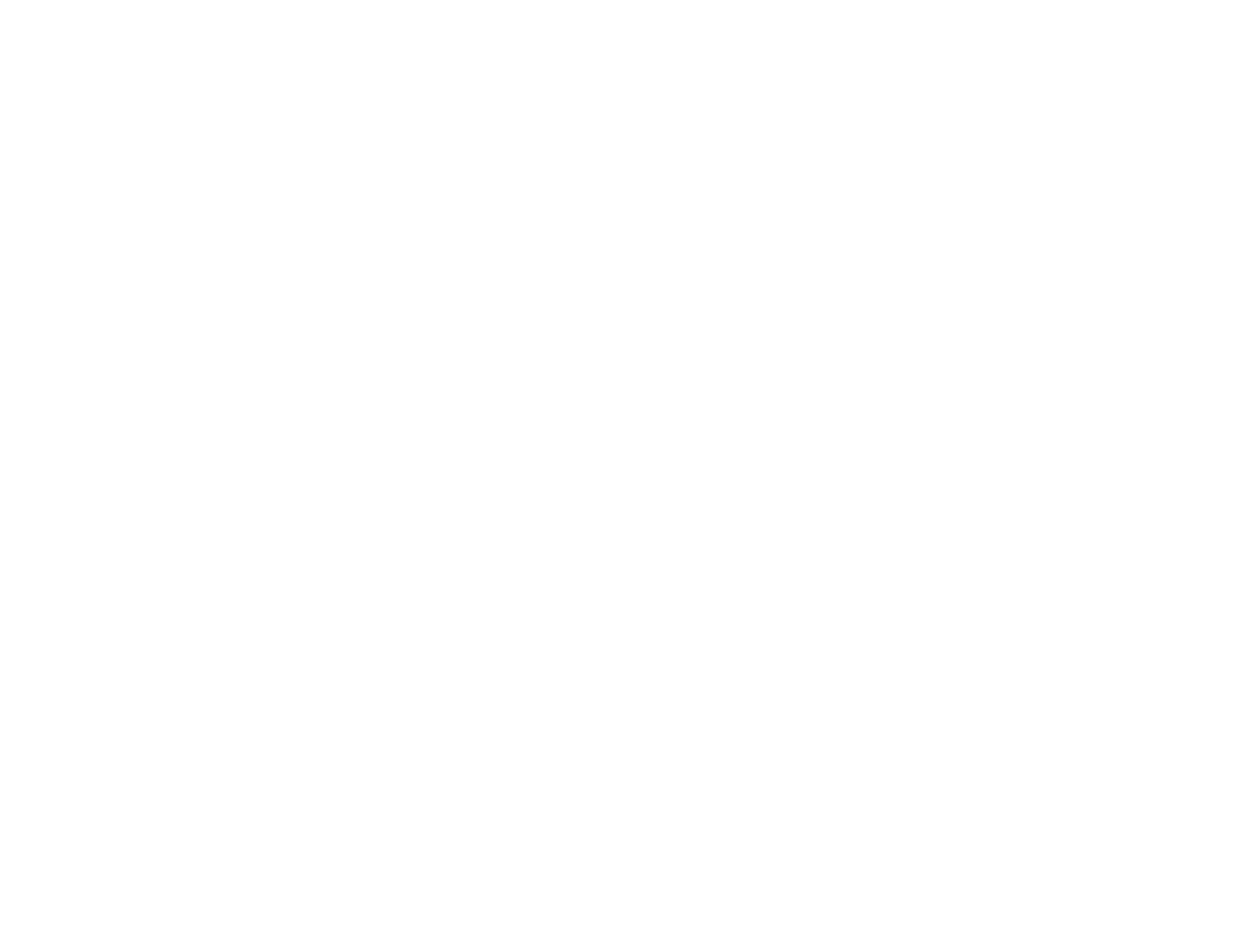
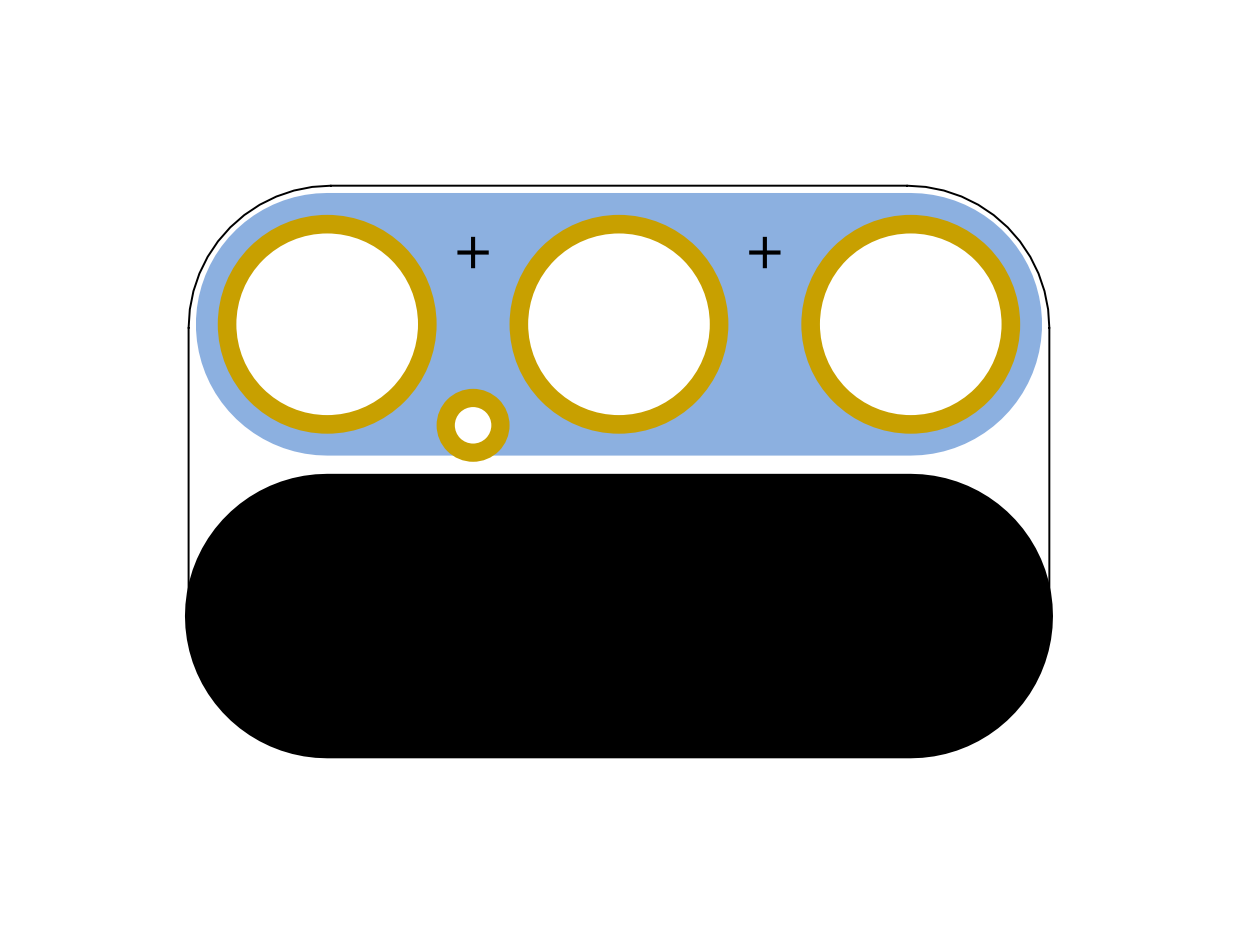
part: none -> (618, 471)

